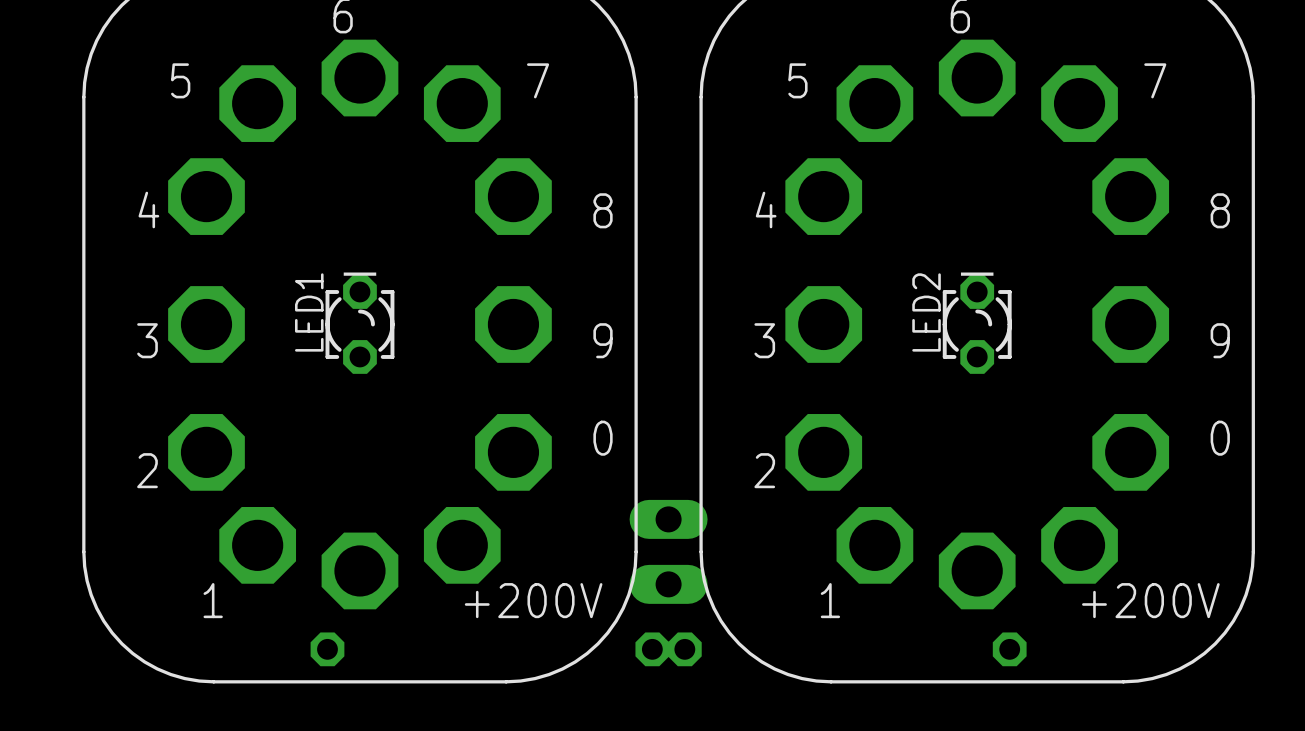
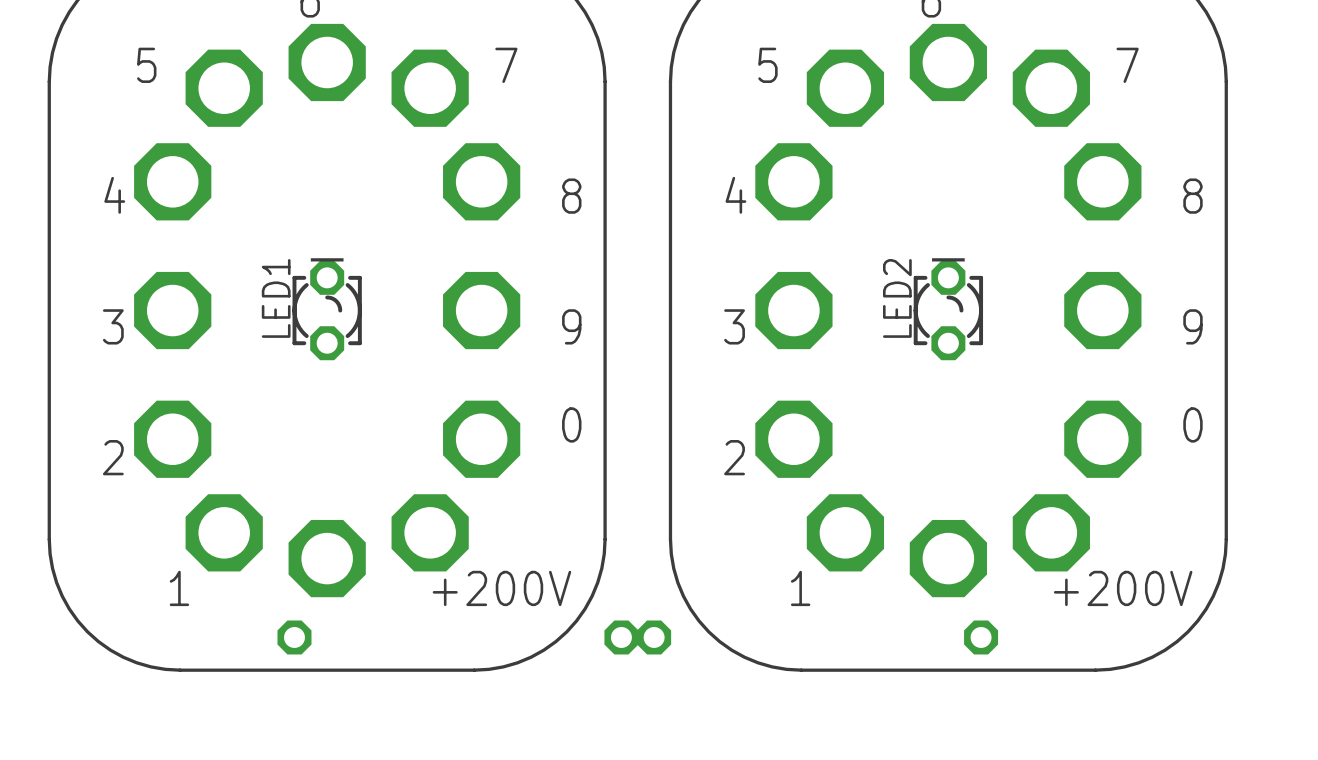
part: (668, 551) -> none

